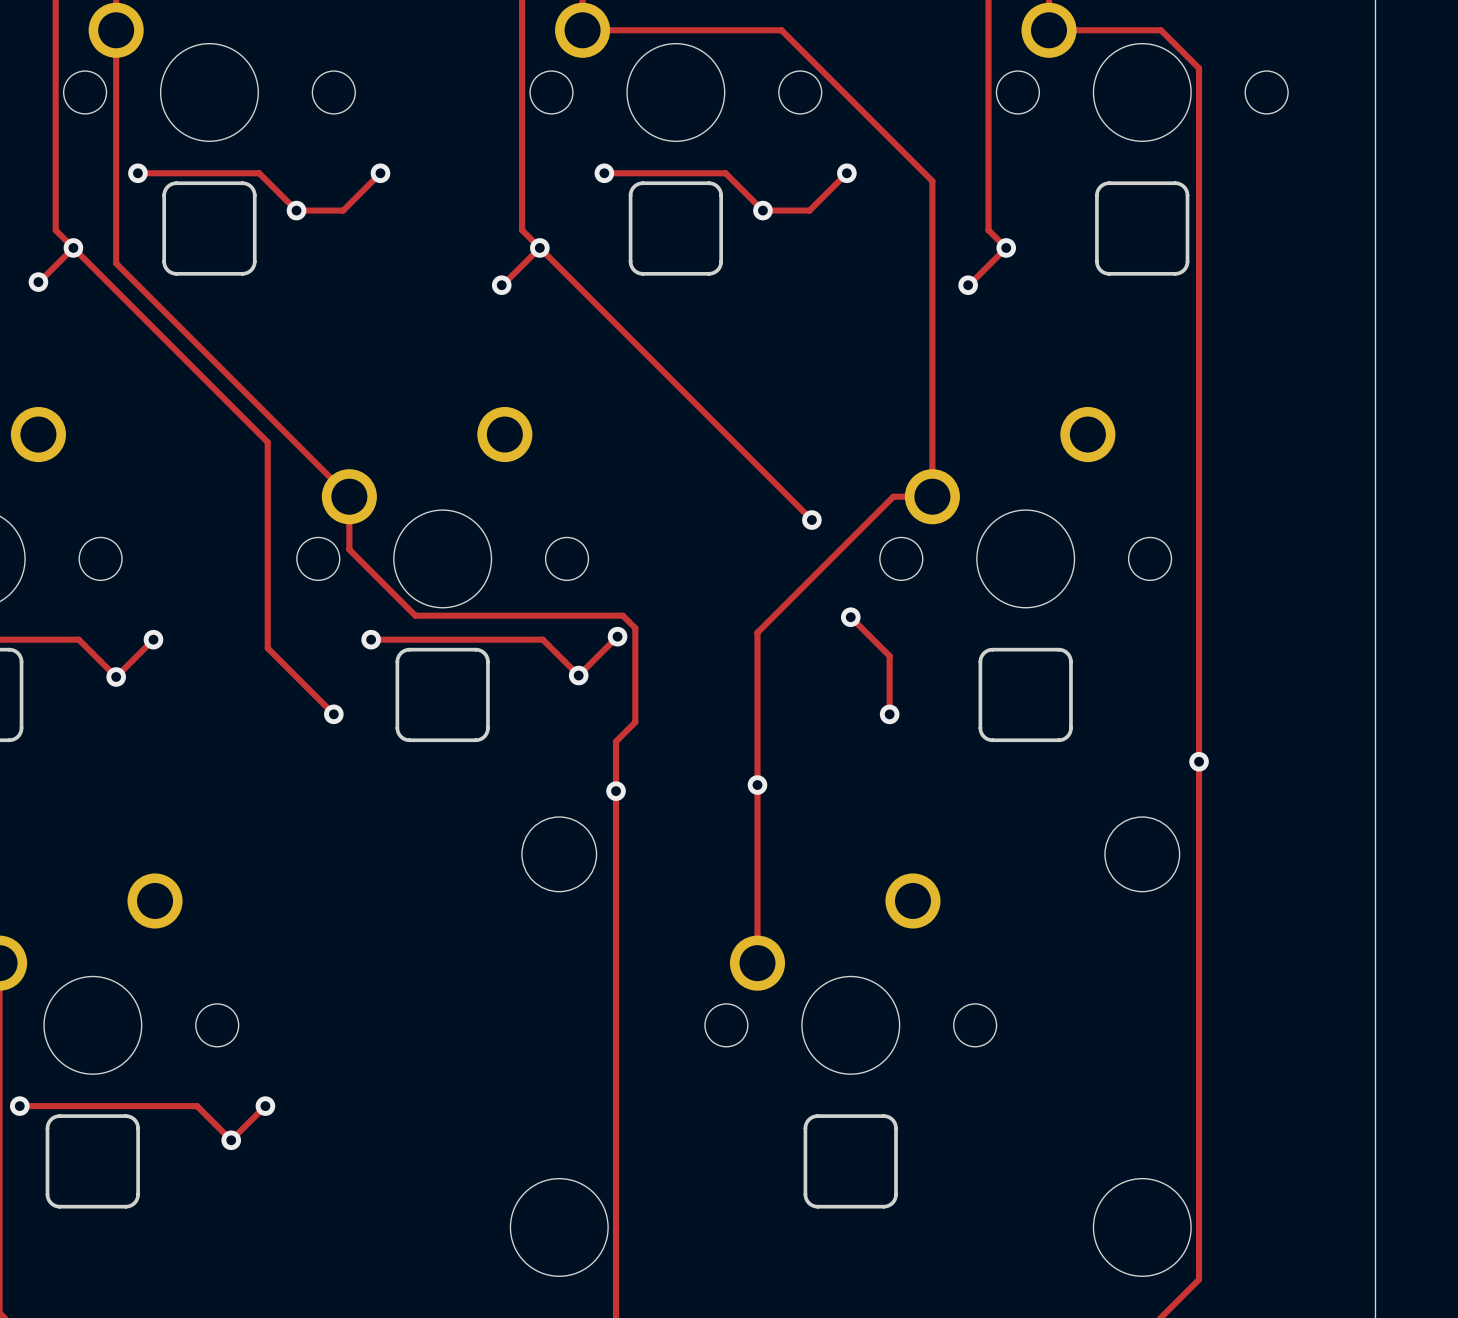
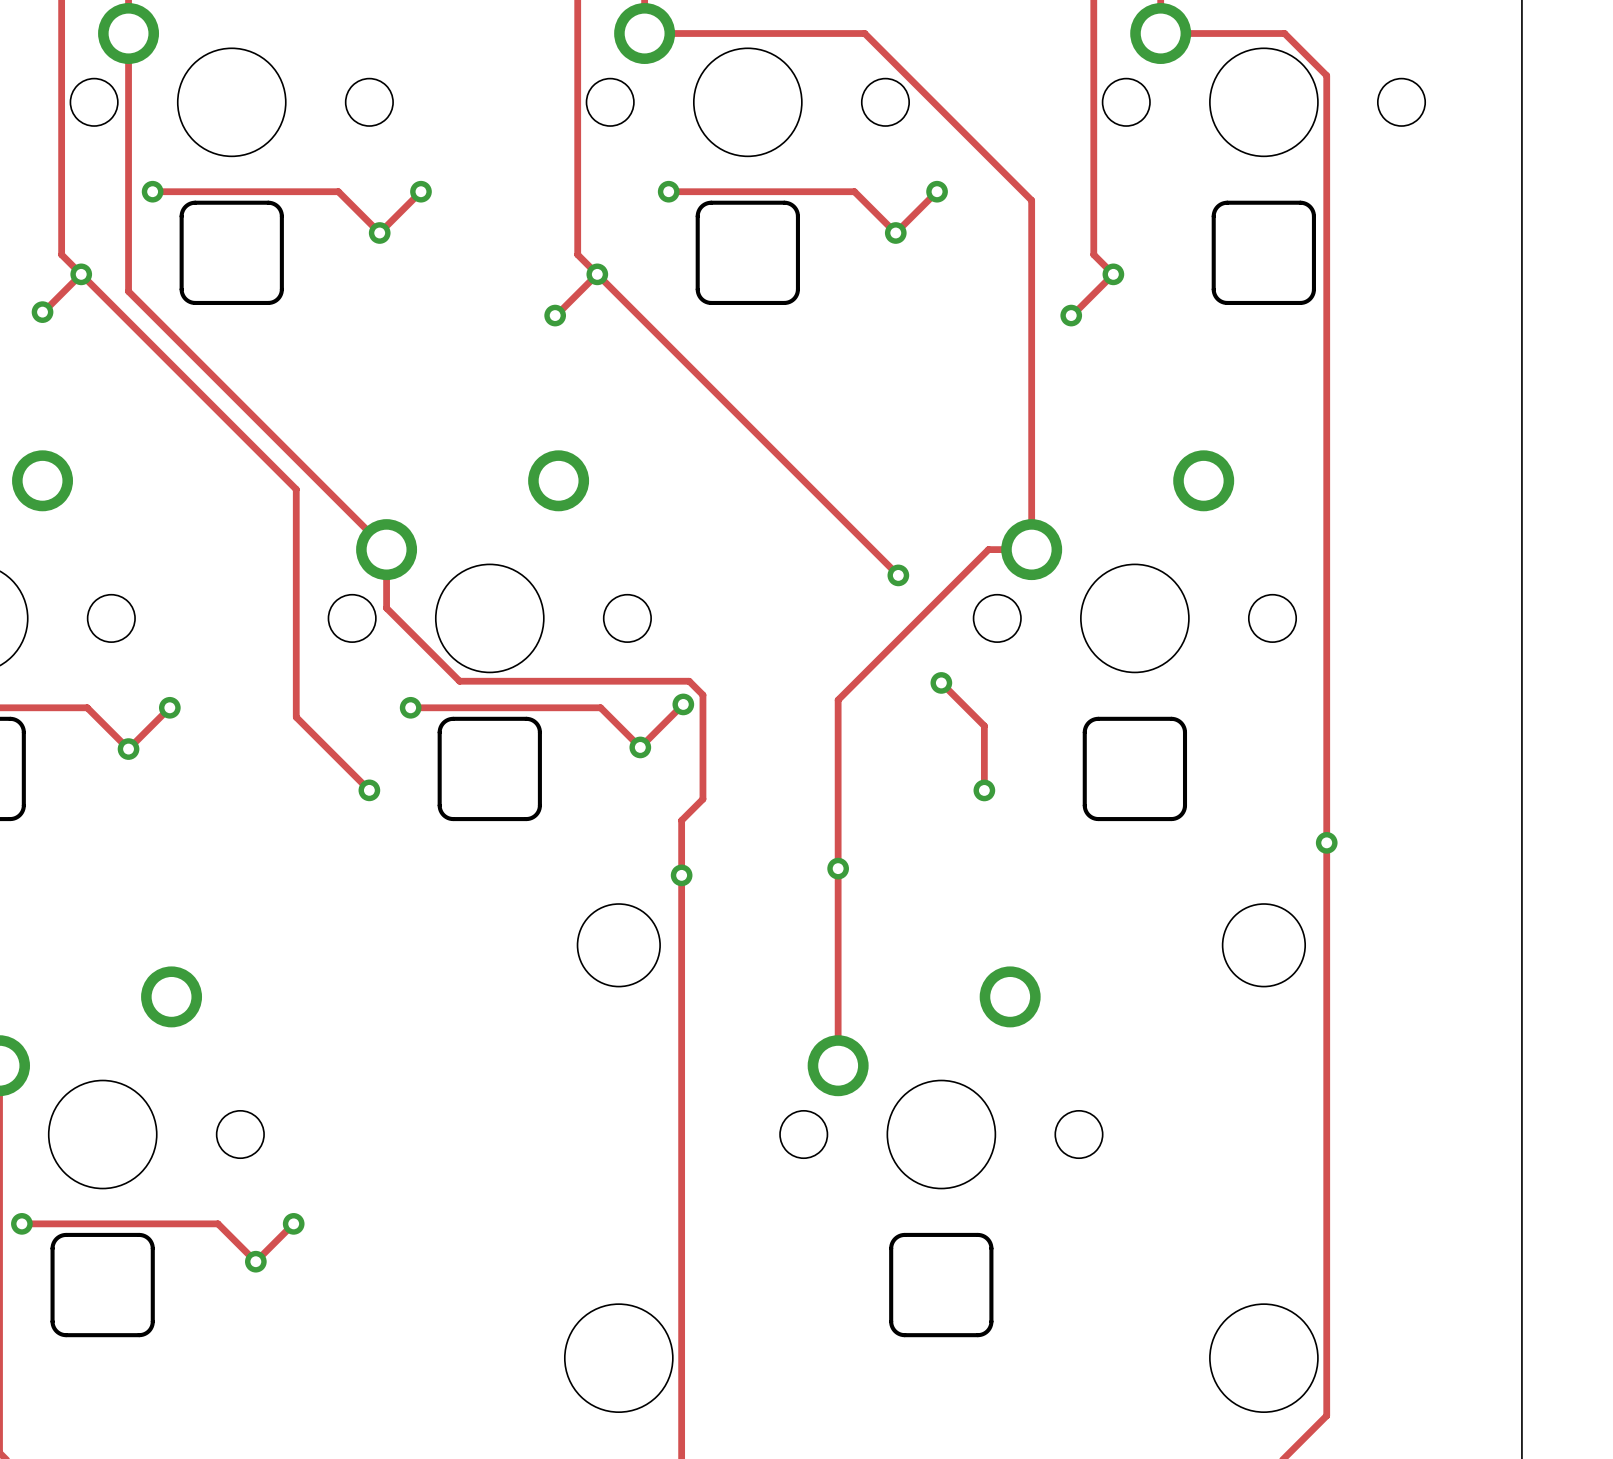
track: (259, 173) (296, 210) (343, 210) -> (286, 191) (338, 191) (379, 232)
track: (725, 173) (762, 210) (809, 210) -> (802, 191) (854, 191) (895, 232)
via position: (296, 210) -> (379, 232)
via position: (762, 210) -> (895, 232)

